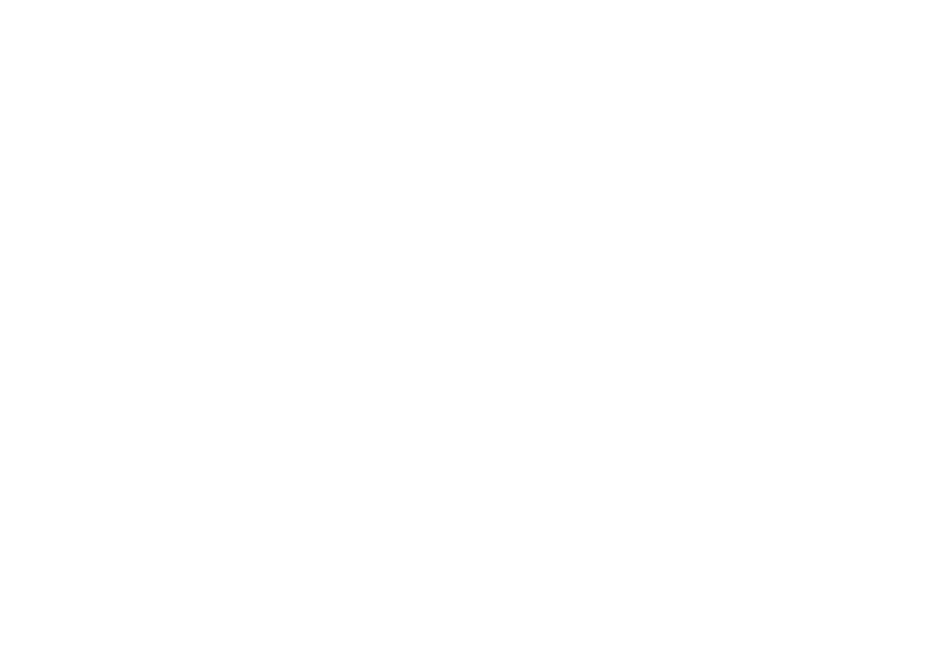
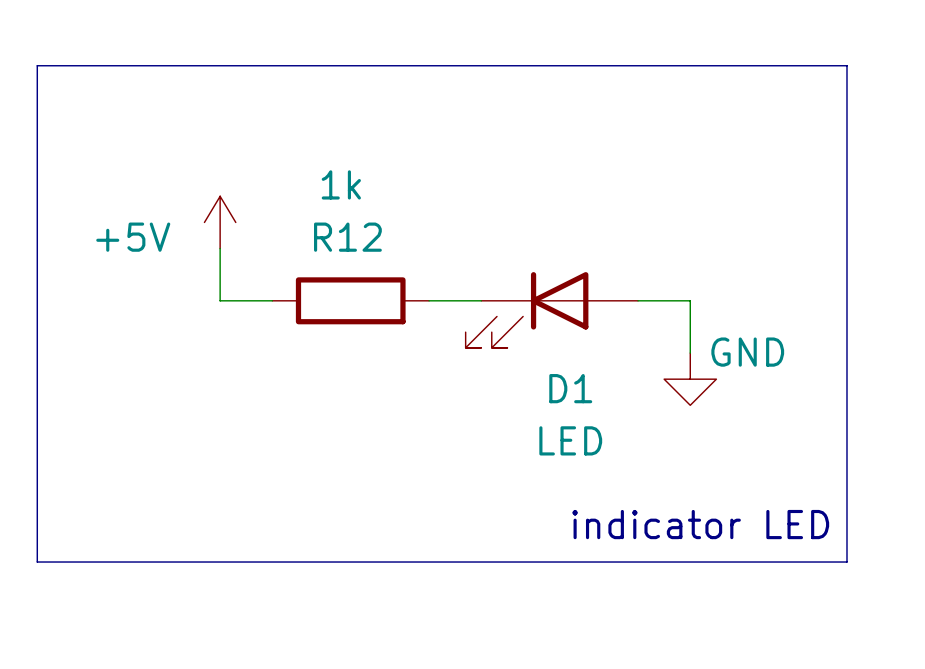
line: none -> (37, 65) (846, 65) (846, 562) (37, 562) (37, 65)
power symbol: none -> +5V (220, 222)
wire: none -> (220, 248) (220, 300) (272, 300)
R12: none -> 1k (350, 300)
wire: none -> (429, 300) (481, 300)
wire: none -> (638, 300) (690, 300) (690, 353)
D1: none -> LED (551, 309)
power symbol: none -> GND (690, 379)
text: none -> indicator LED (700, 524)

